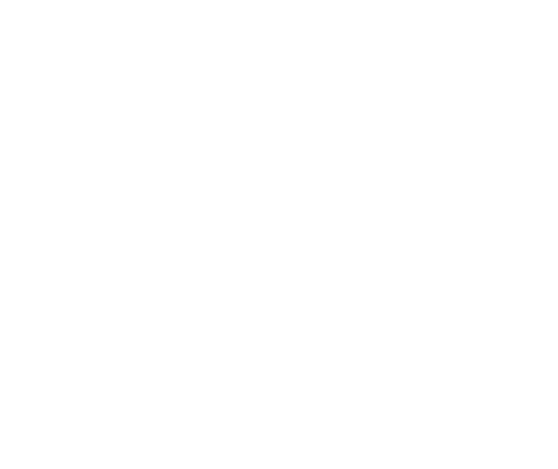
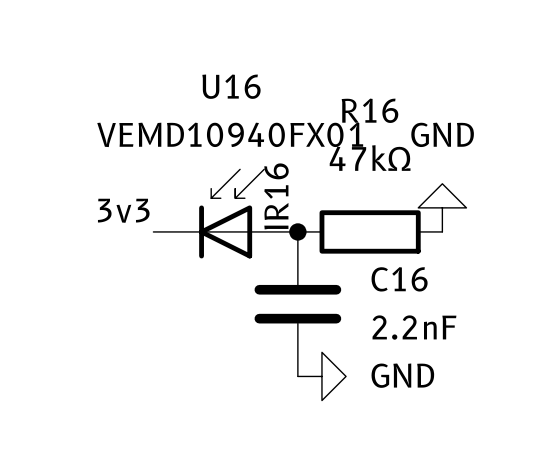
label: none -> IR16 (276, 196)
power symbol: none -> GND (442, 207)
label: none -> 3v3 (123, 210)
U16: none -> VEMD10940FX01 (225, 213)
junction: none -> (297, 231)
R16: none -> 47kΩ (370, 231)
C16: none -> 2.2nF (297, 304)
power symbol: none -> GND (321, 376)

